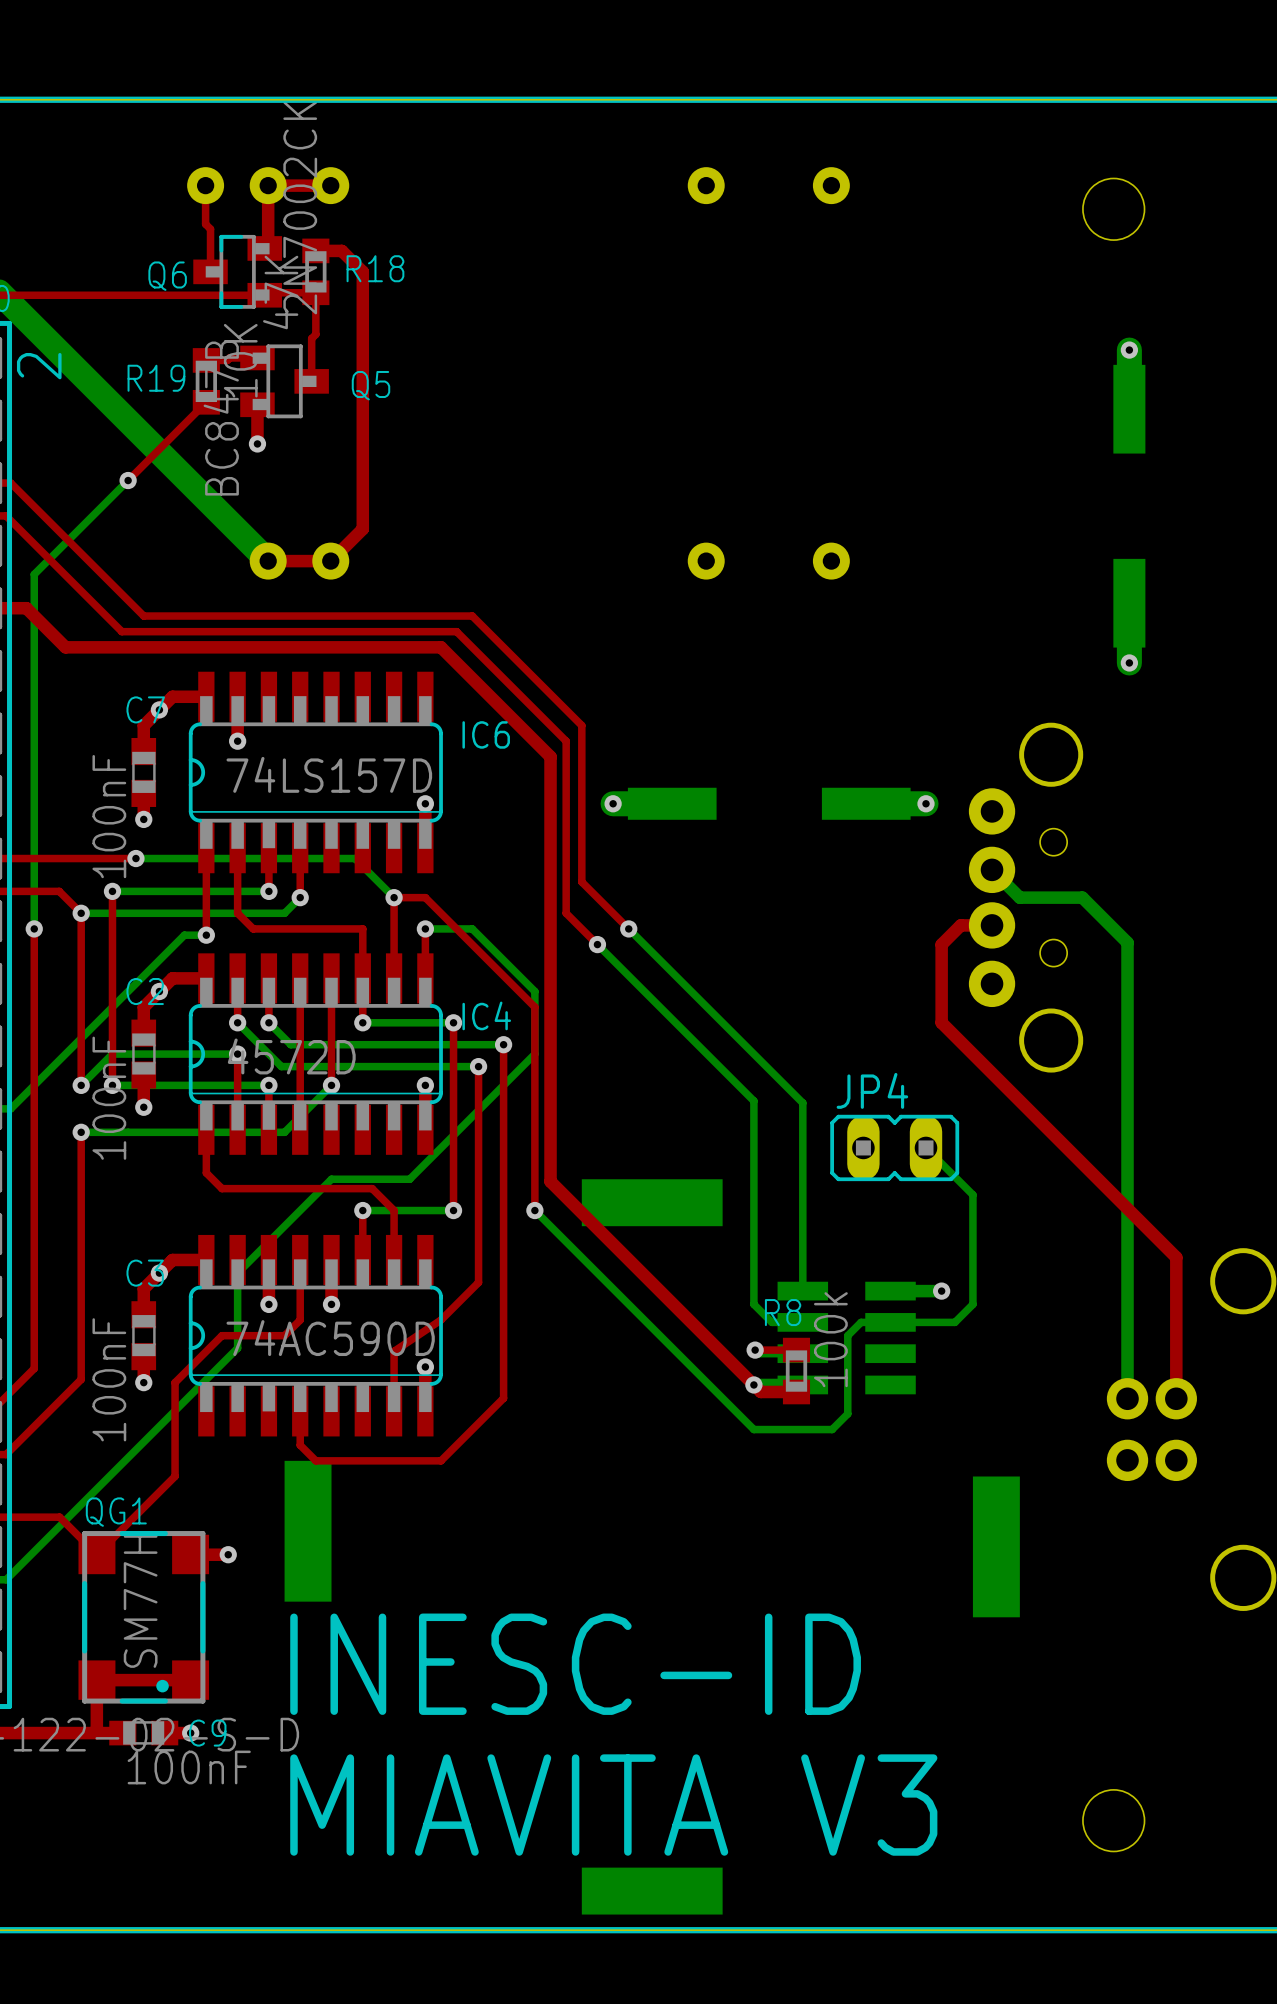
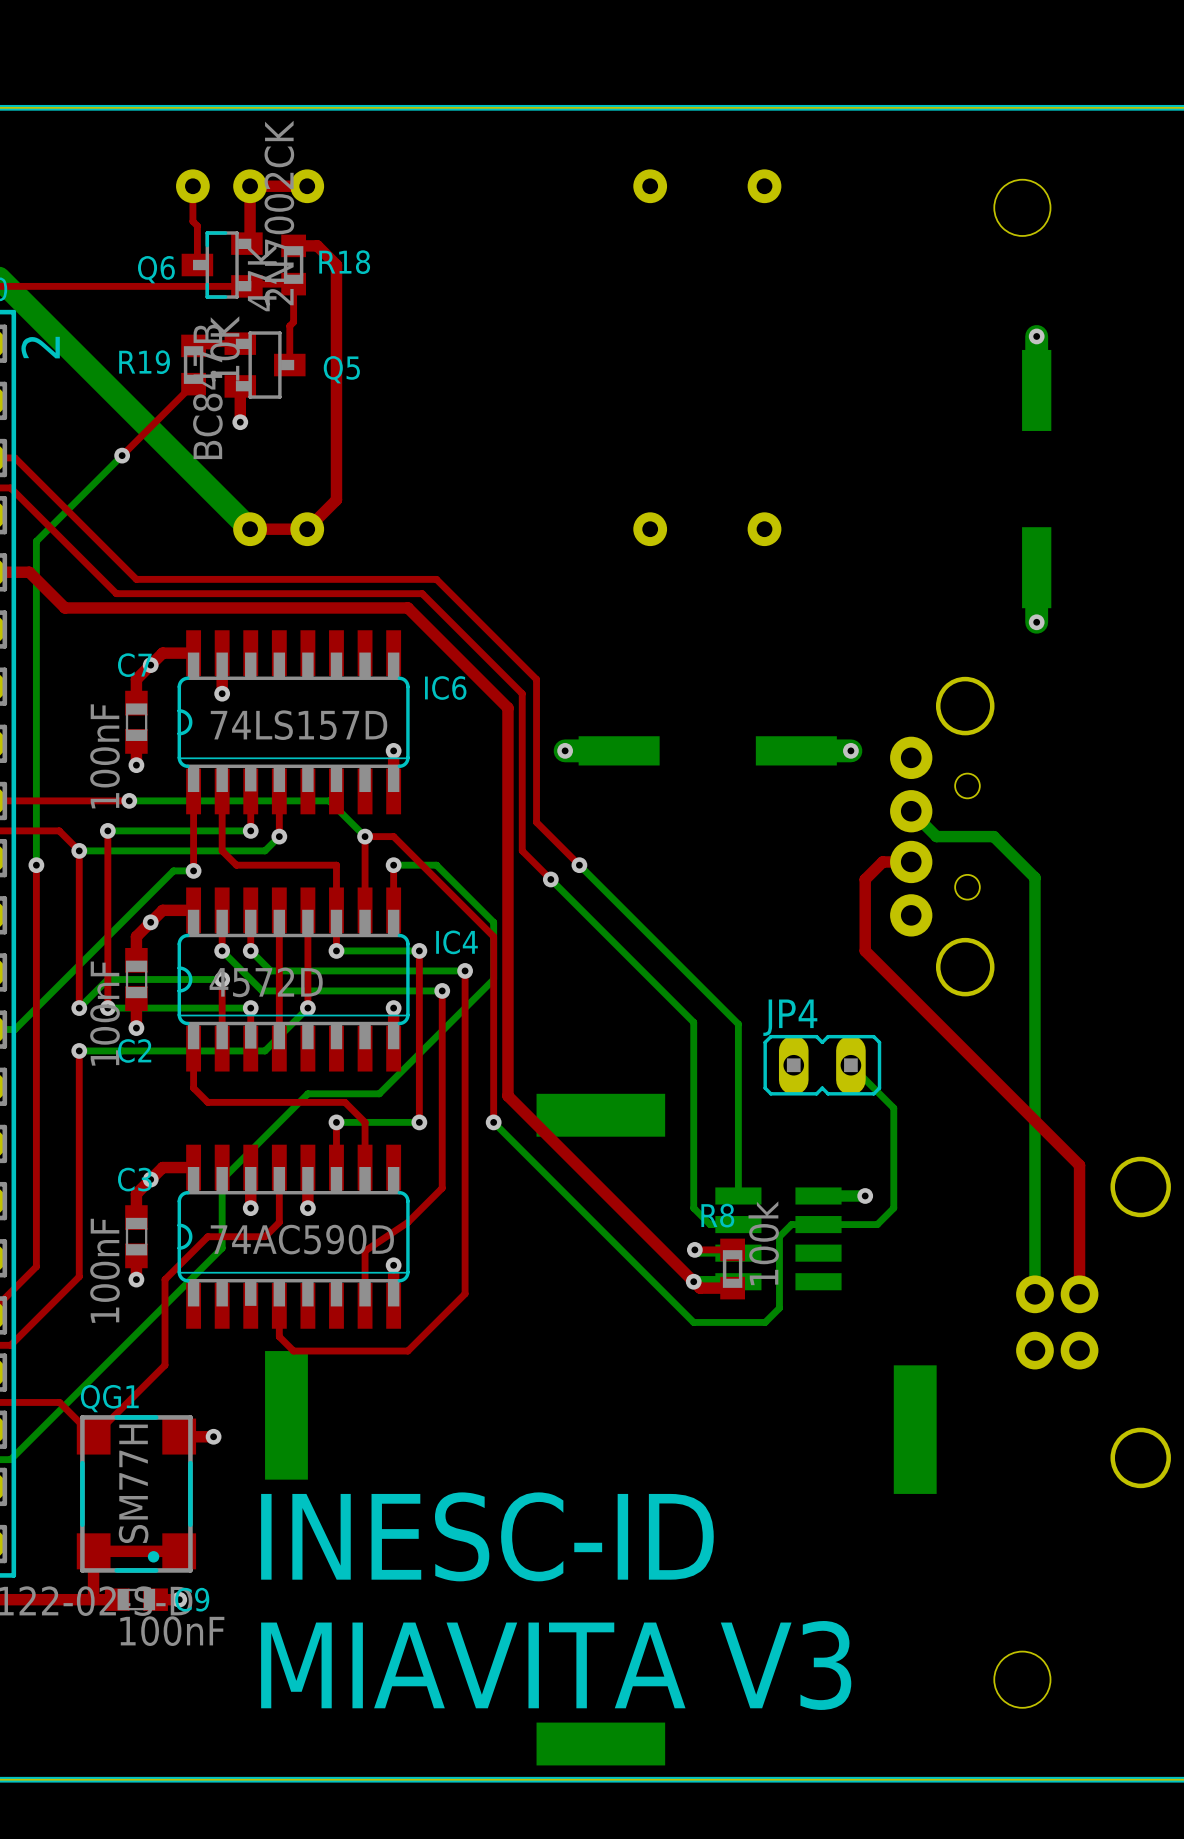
C2 name position: C2 (145, 991) -> C2 (134, 1050)
IC4 name position: IC4 (486, 1015) -> IC4 (456, 942)

